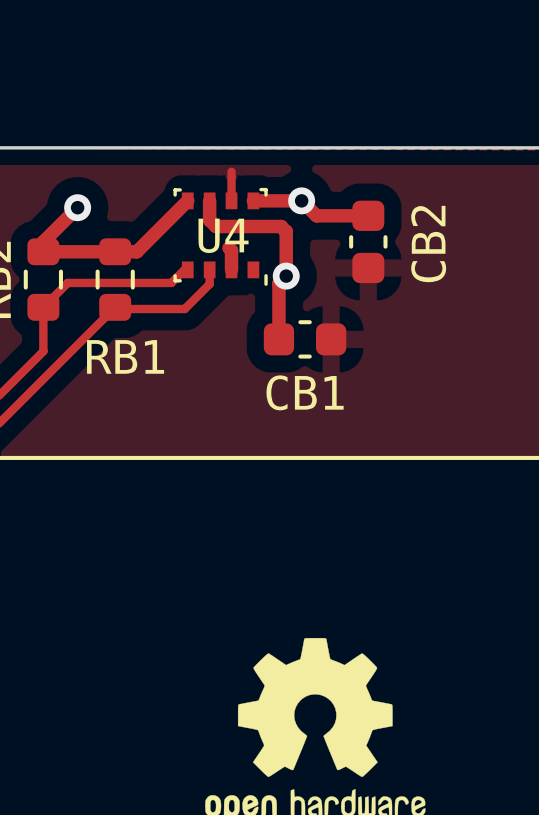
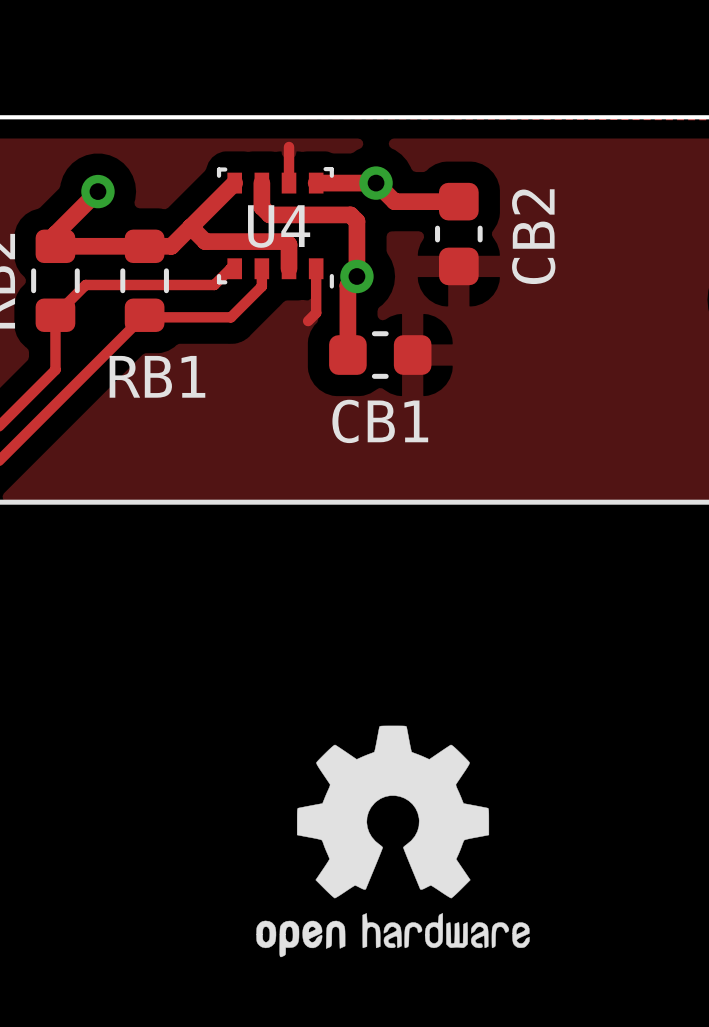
track: none -> (190, 227) (205, 241) (285, 241)
track: none -> (316, 268) (316, 313) (308, 321)

